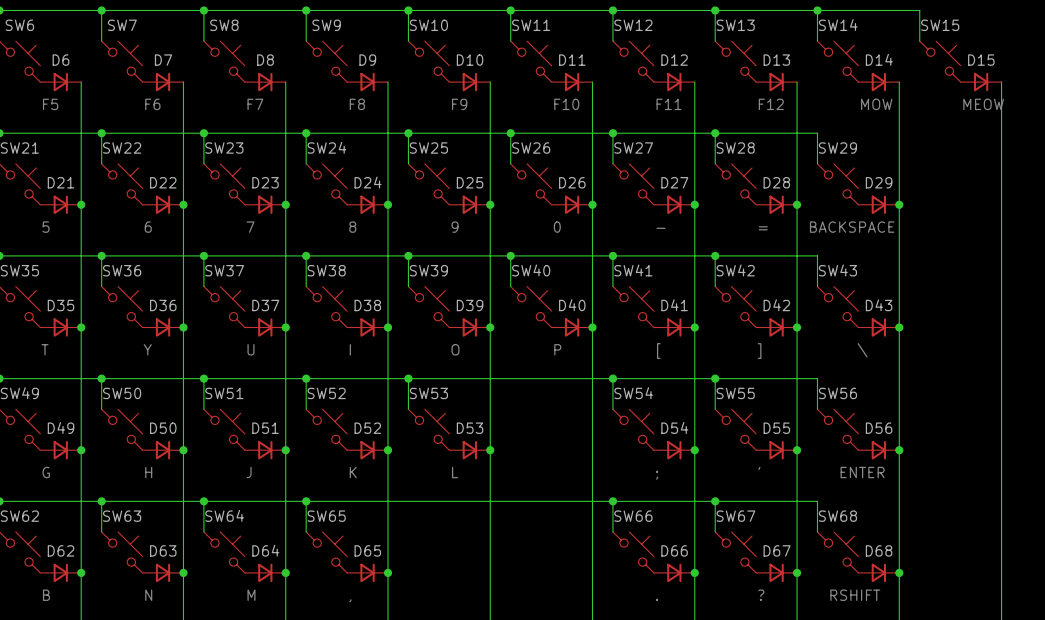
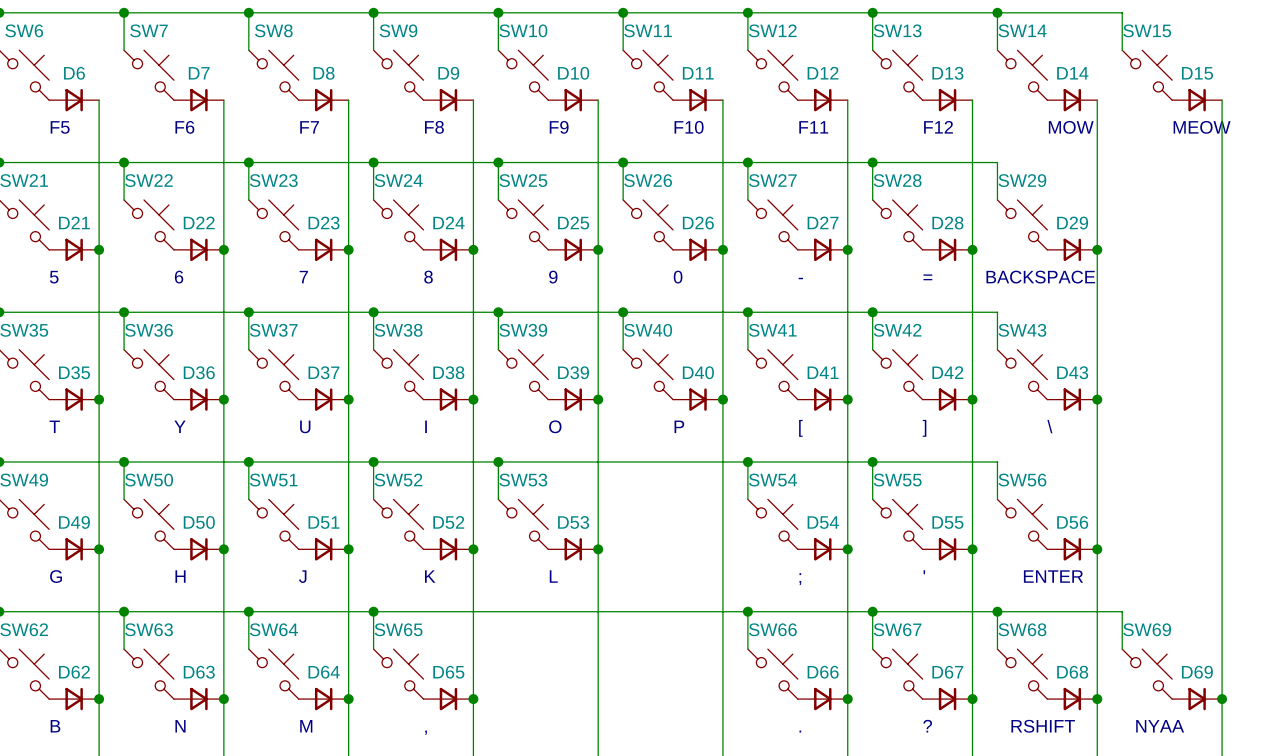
wire: none -> (997, 611) (1122, 611) (1122, 649)
junction: none -> (997, 611)
SW69: none -> (1147, 674)
D69: none -> (1197, 699)
junction: none -> (1222, 699)
text: none -> NYAA (1160, 726)

